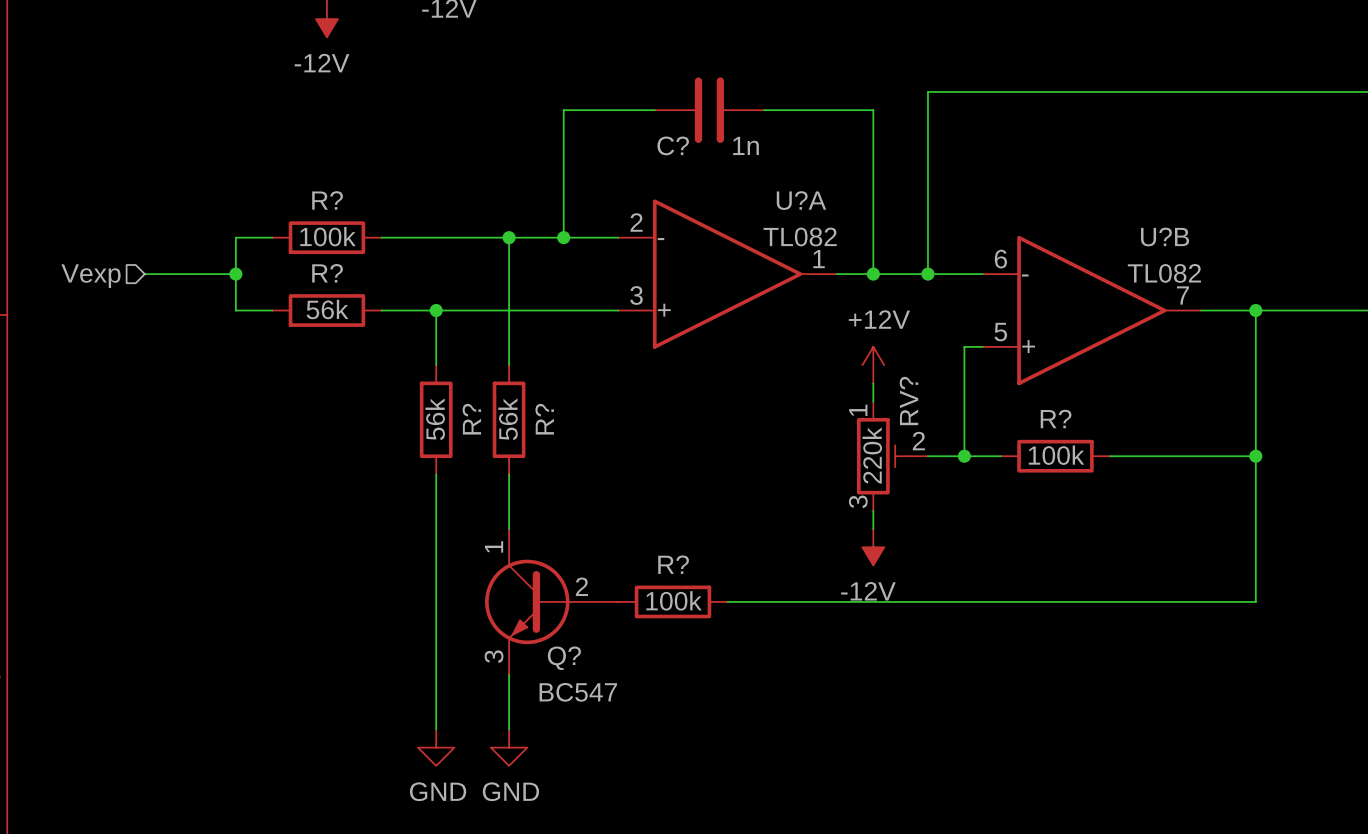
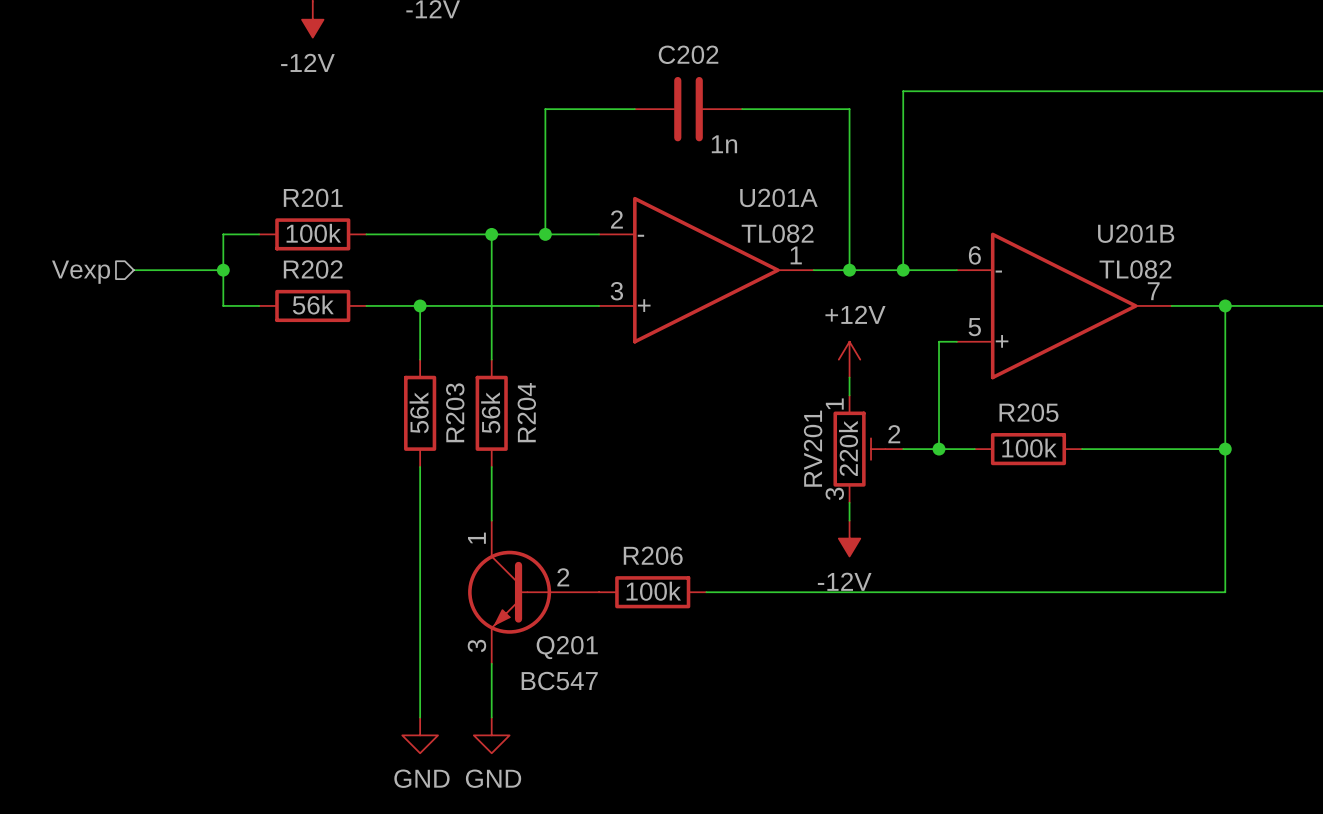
C? name: C? (673, 145) -> C202 (688, 54)
R? name: R? (327, 200) -> R201 (313, 197)
U?A name: U?A (801, 200) -> U201A (778, 197)
U?B name: U?B (1165, 236) -> U201B (1136, 233)
R? name: R? (327, 273) -> R202 (313, 269)
RV? name: RV? (908, 401) -> RV201 (813, 448)
R? name: R? (1056, 418) -> R205 (1028, 412)
R? name: R? (471, 419) -> R203 (455, 412)
R? name: R? (544, 419) -> R204 (526, 412)
R? name: R? (673, 564) -> R206 (653, 555)
Q? name: Q? (564, 658) -> Q201 (567, 647)

